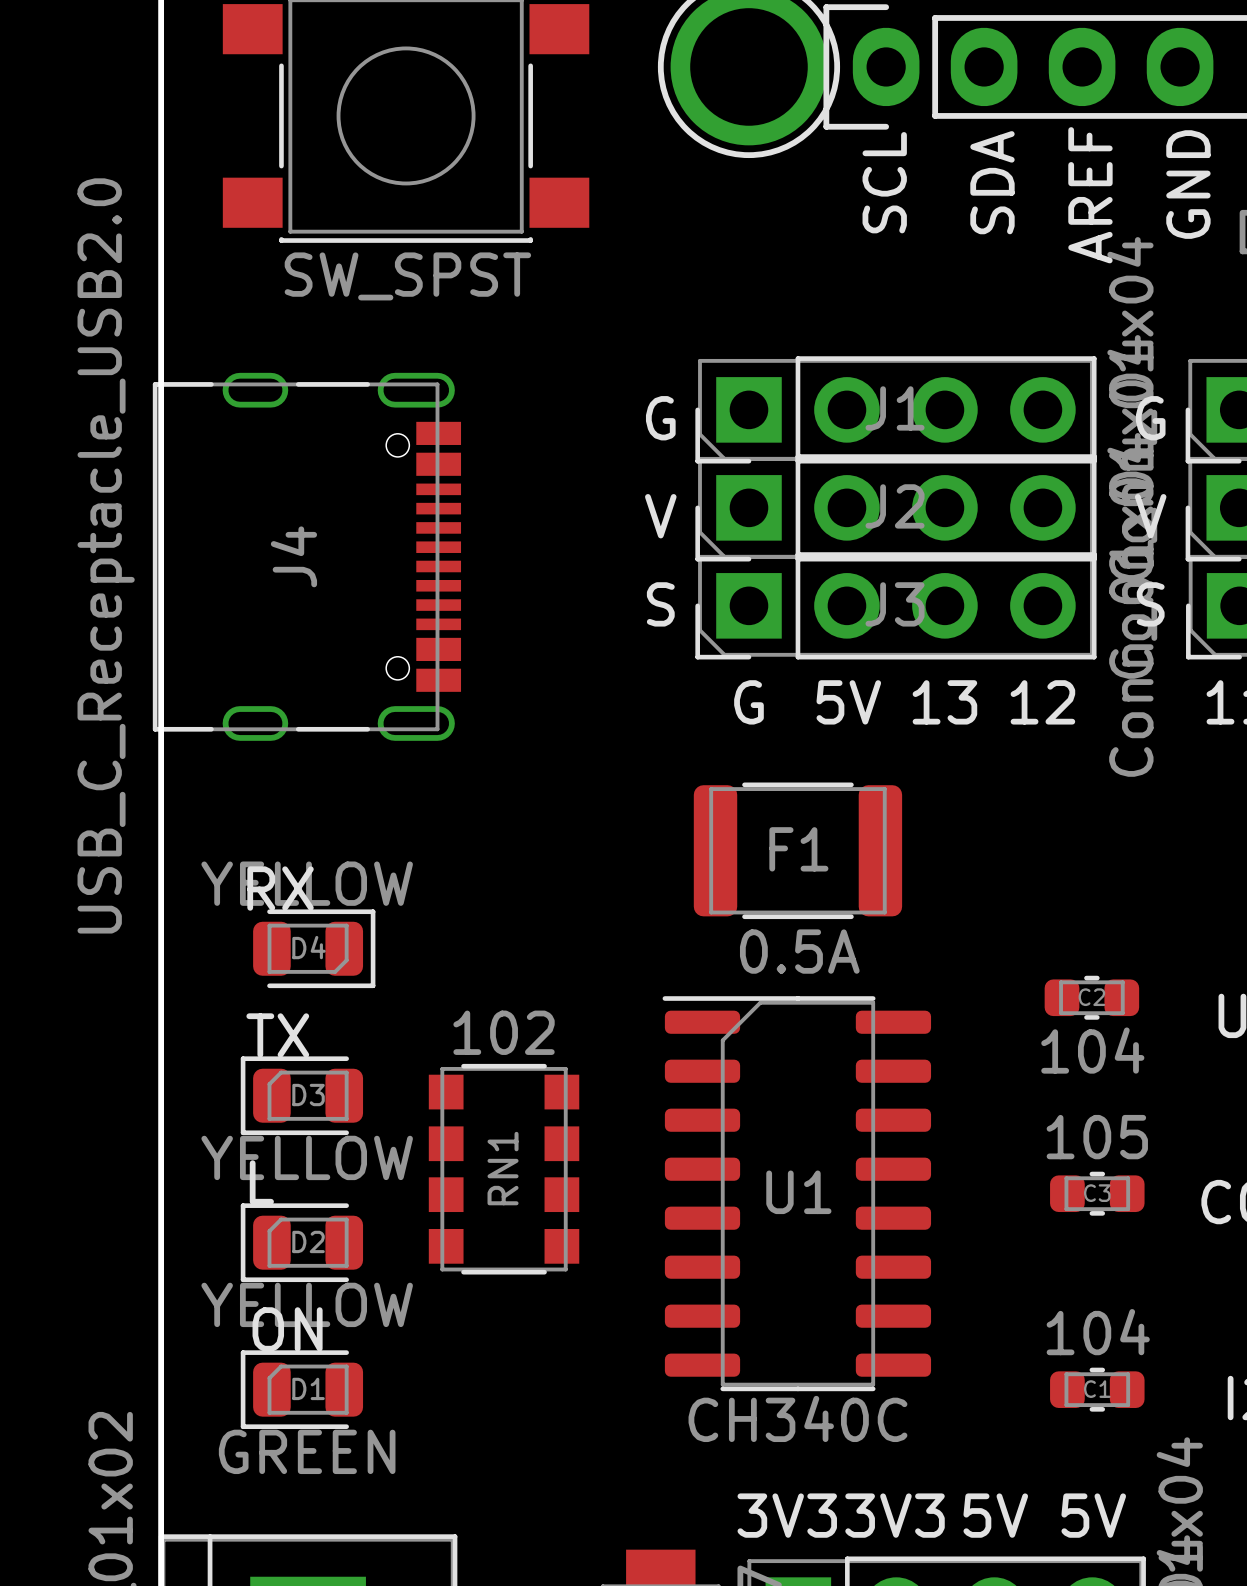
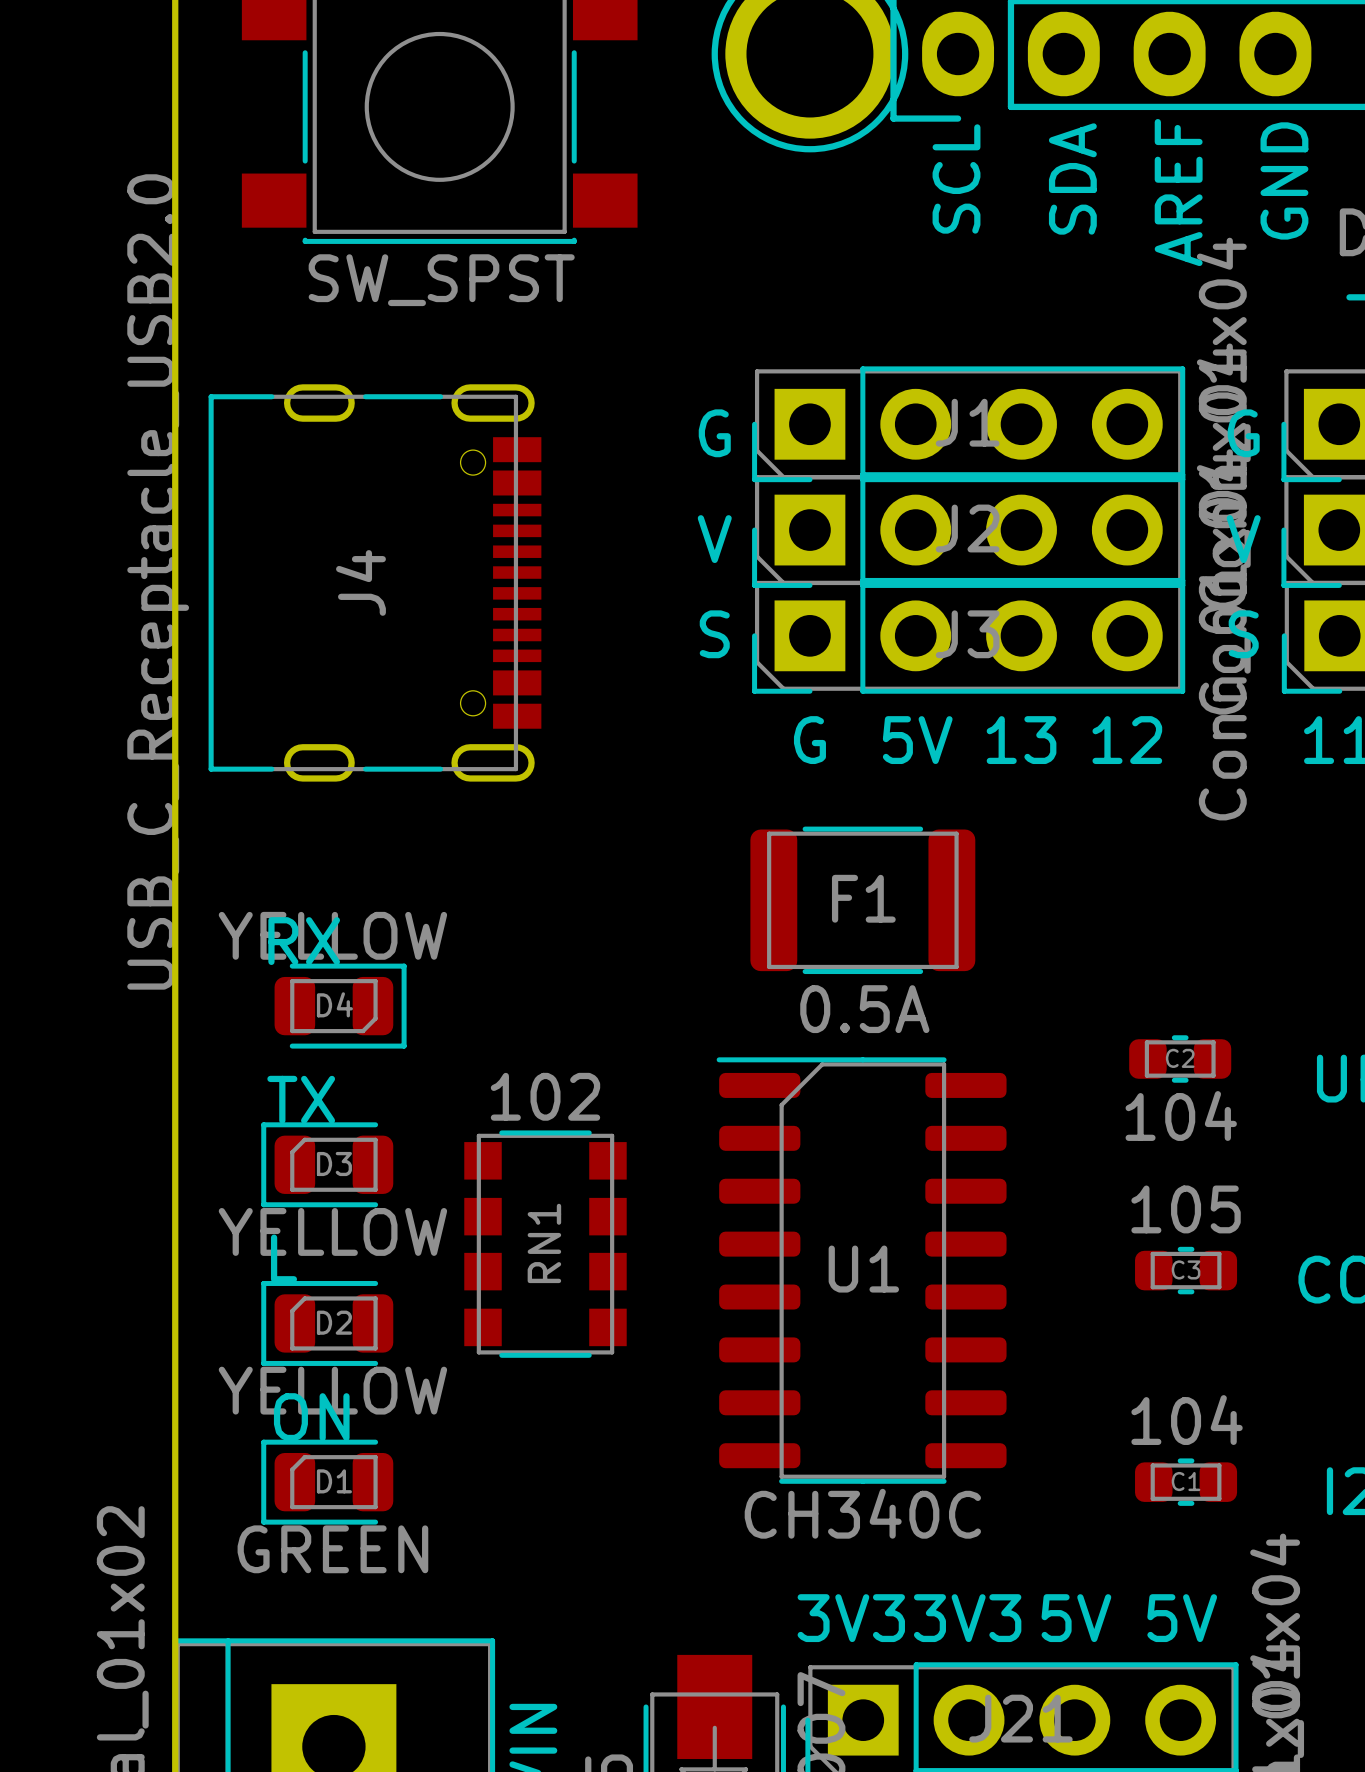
J4 position: (306, 556) -> (374, 582)

